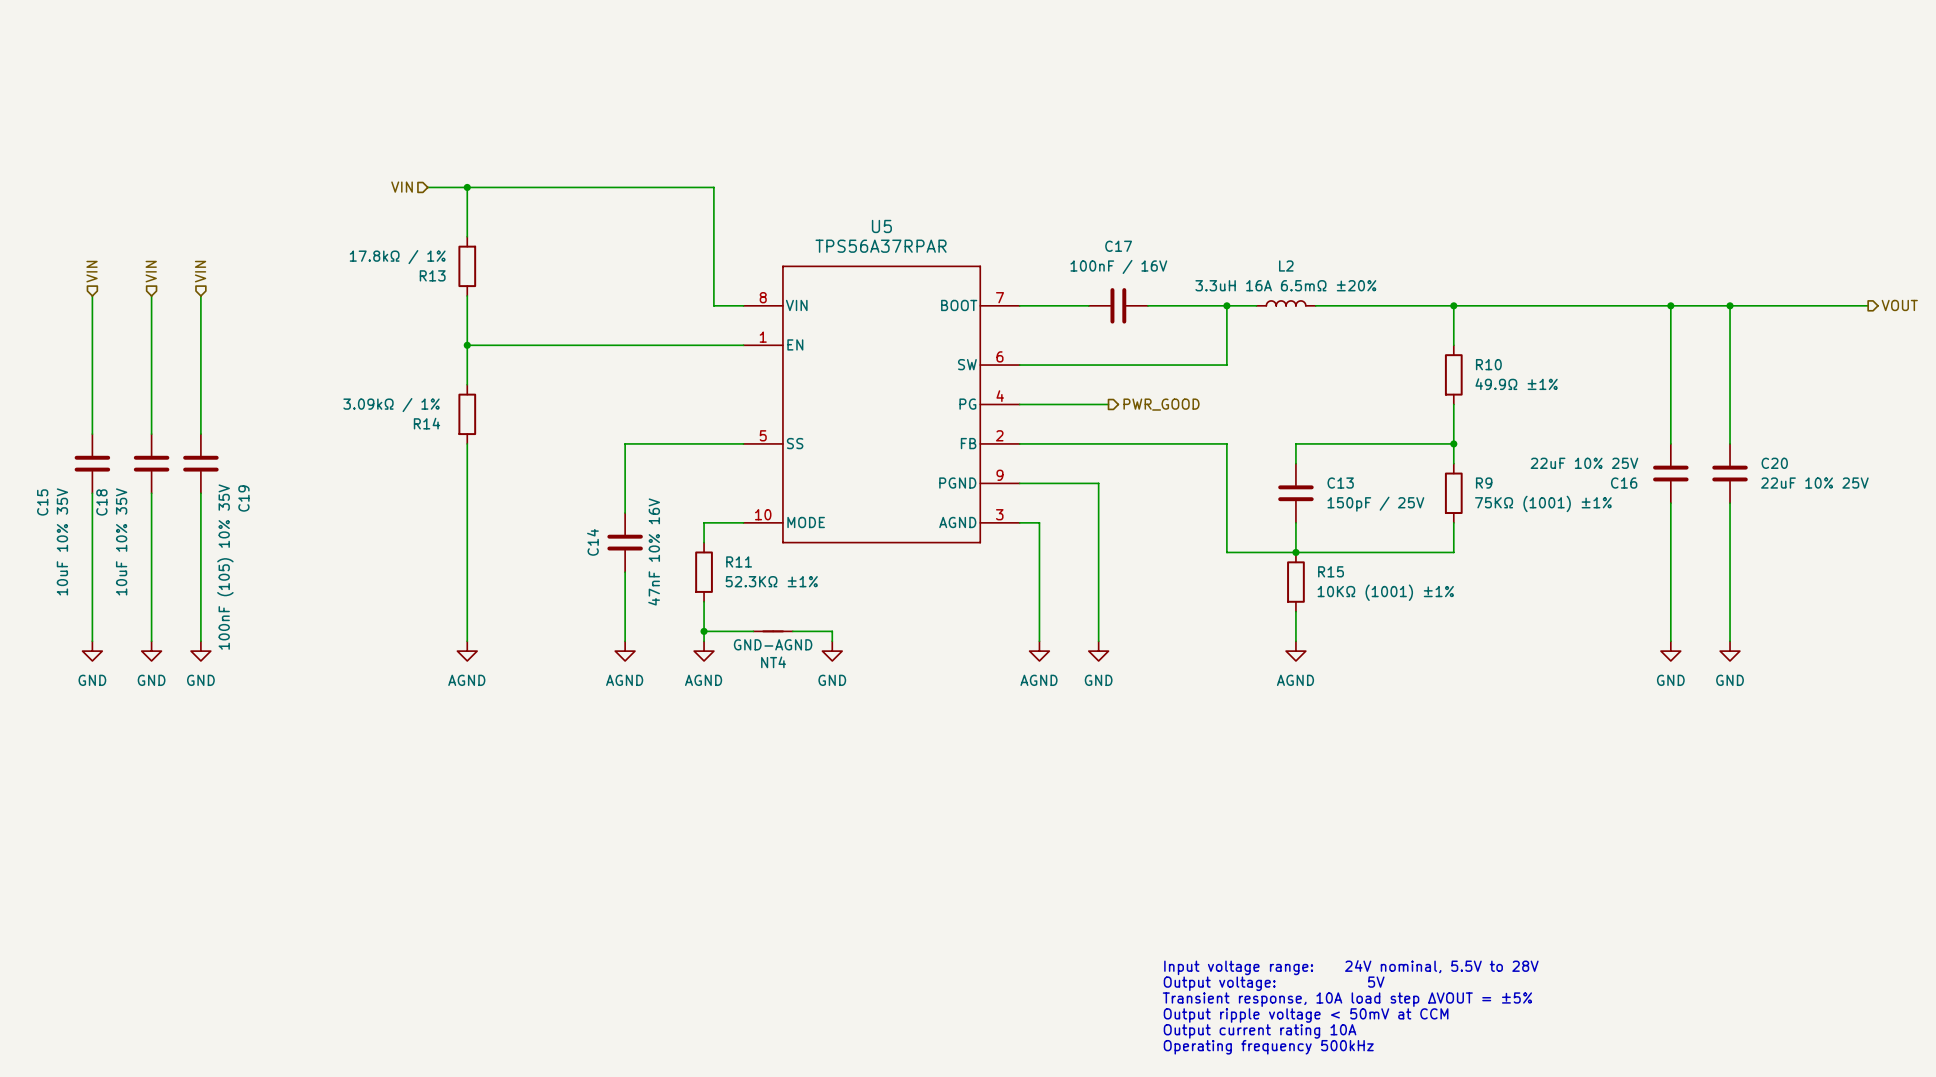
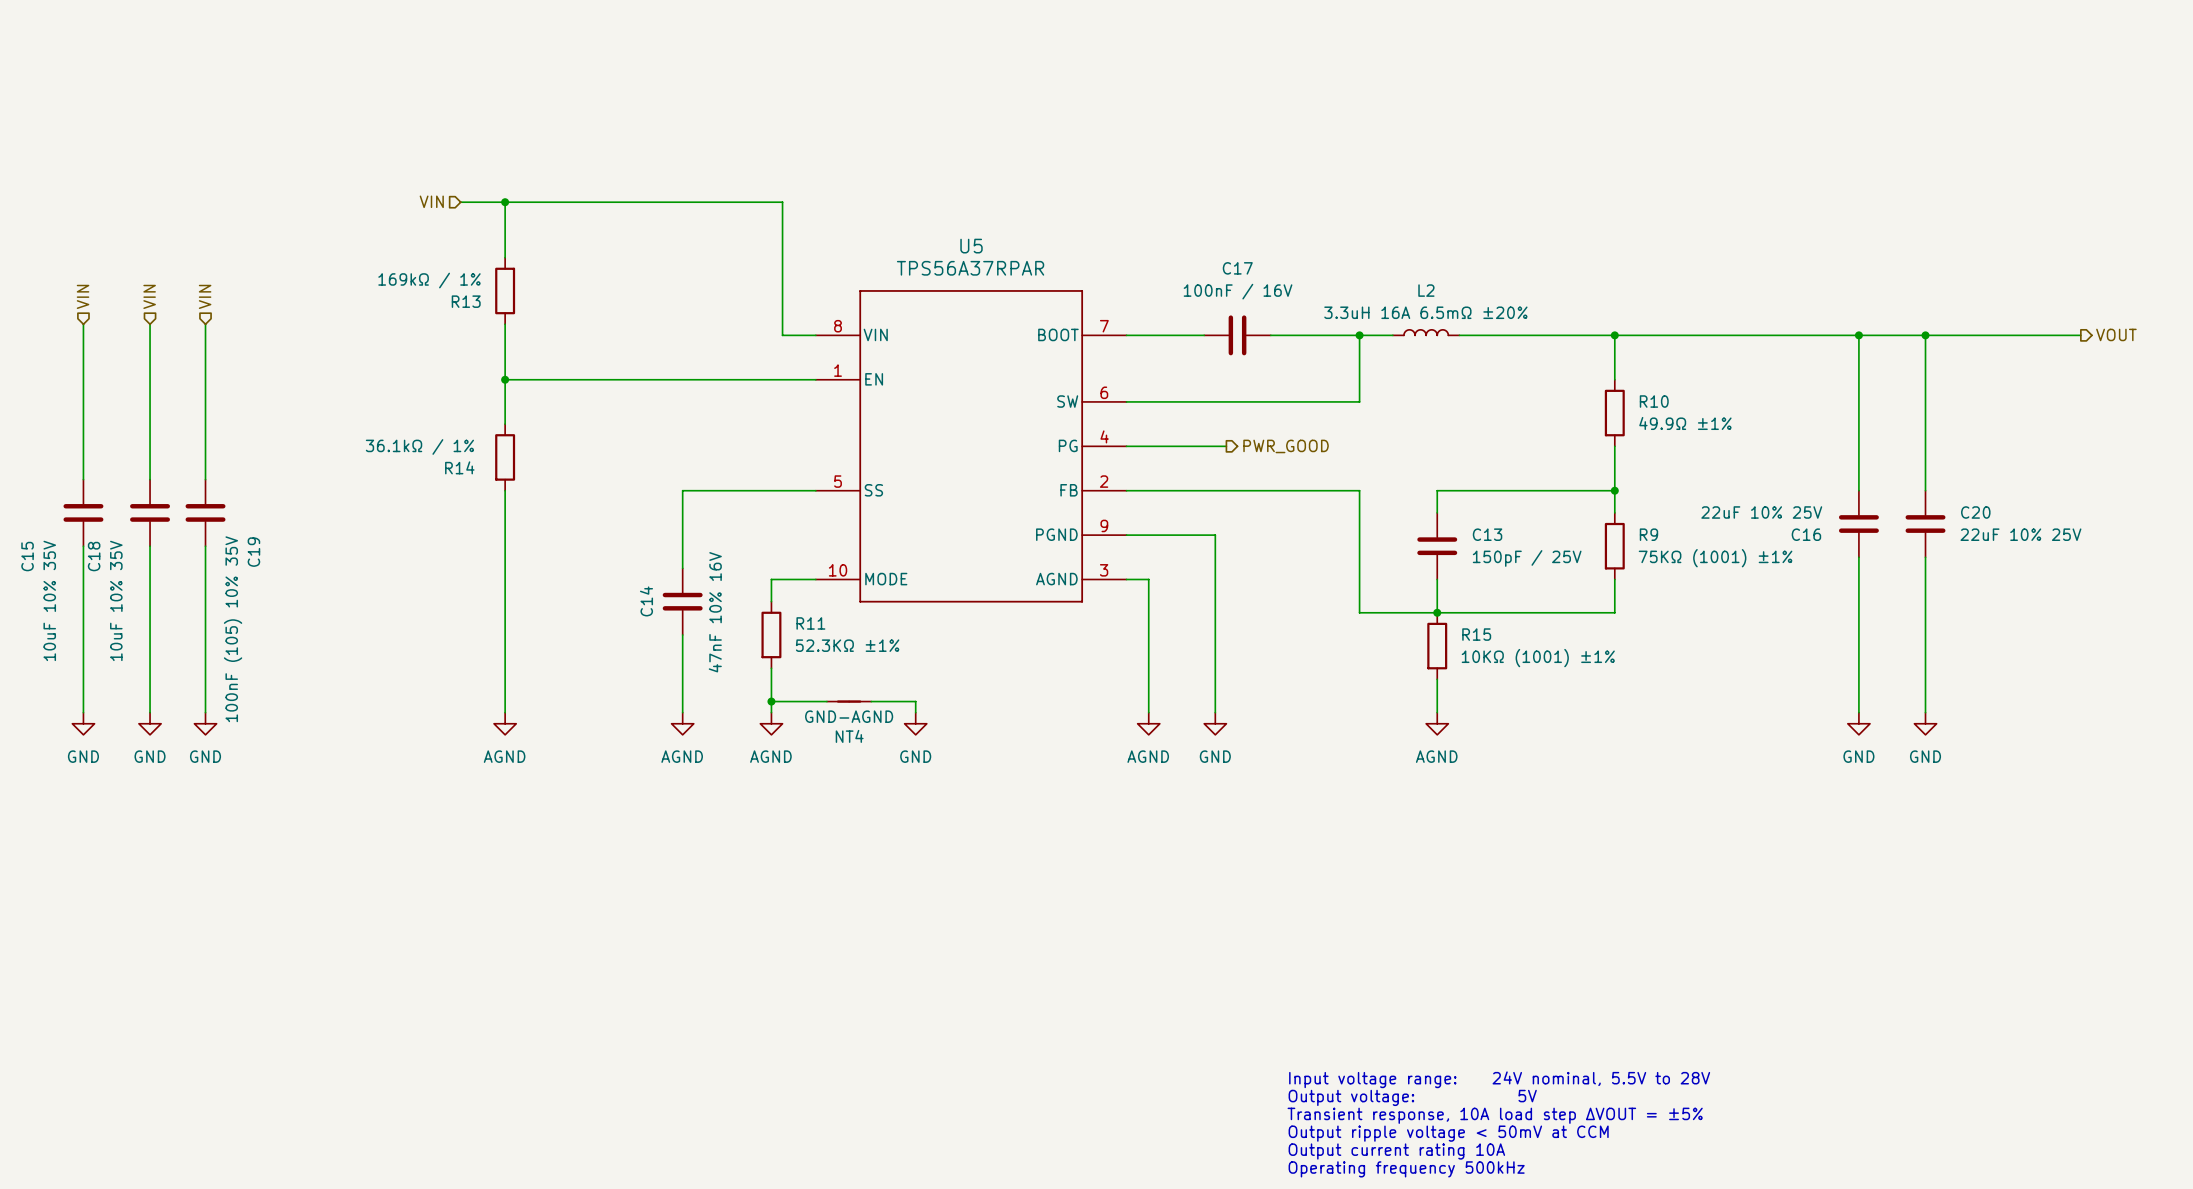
R13 value: 17.8kΩ / 1% (397, 257) -> 169kΩ / 1% (429, 280)
R14 value: 3.09kΩ / 1% (391, 405) -> 36.1kΩ / 1% (419, 446)

